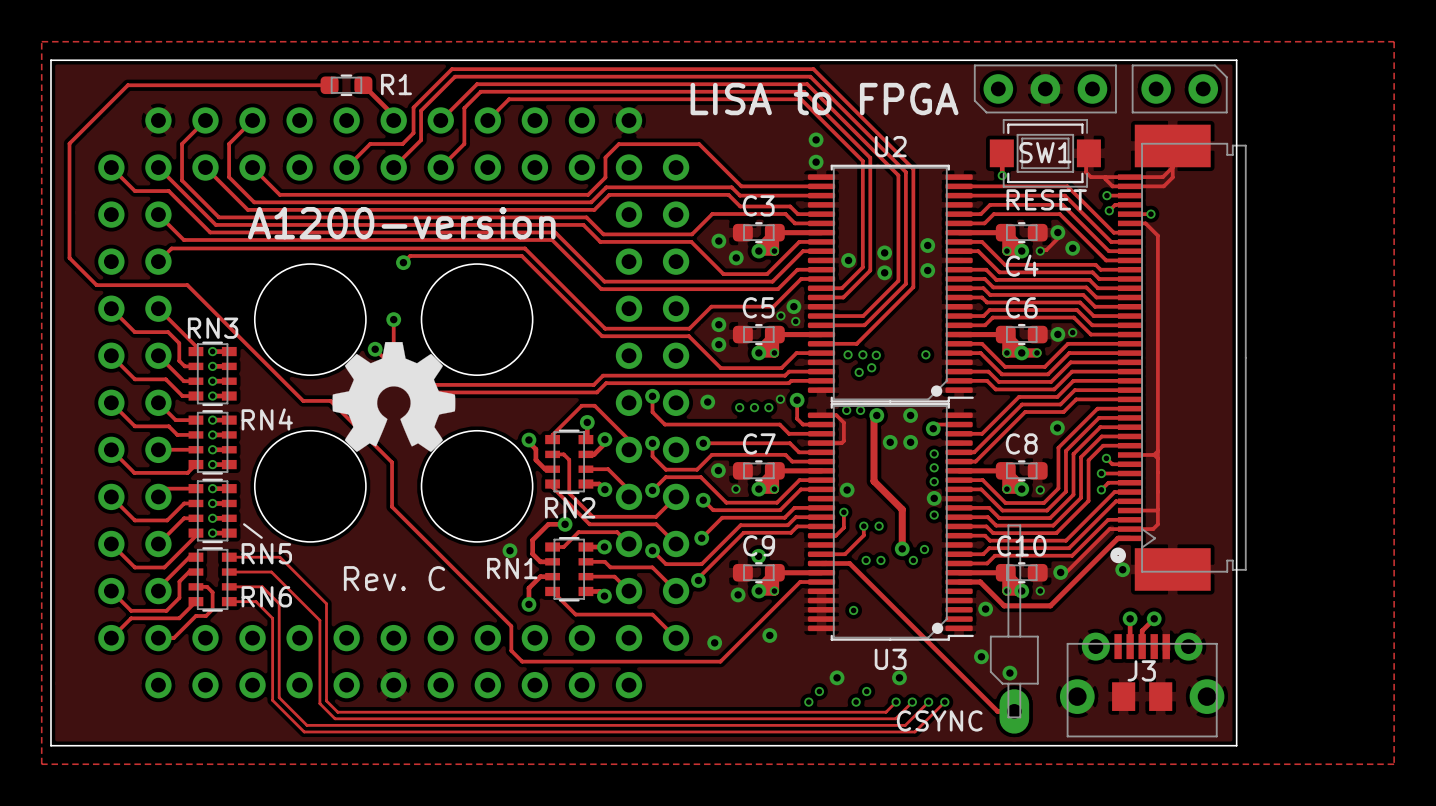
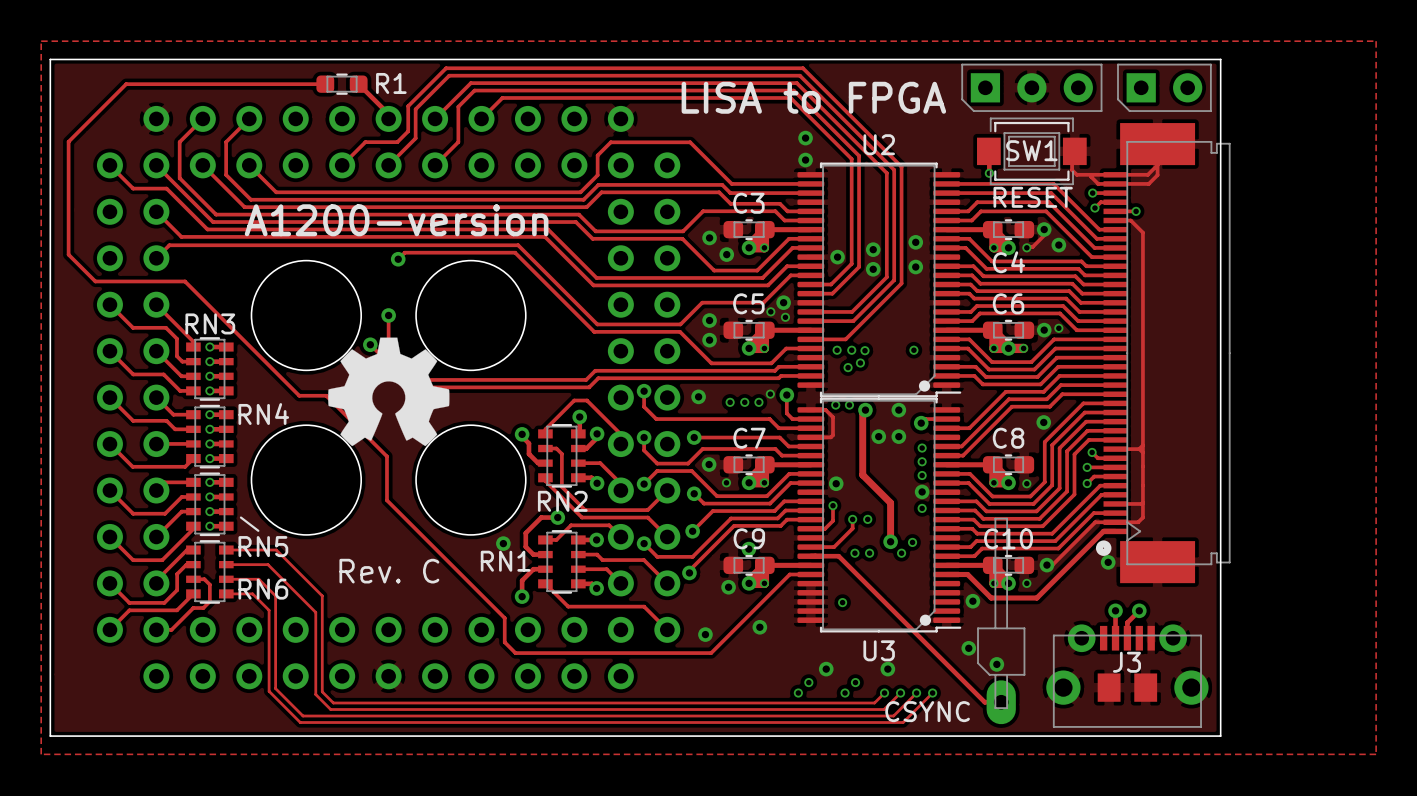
part footprint: [973, 64, 1117, 114] -> [961, 63, 1103, 112]
part footprint: [1131, 64, 1228, 114] -> [1117, 63, 1212, 112]

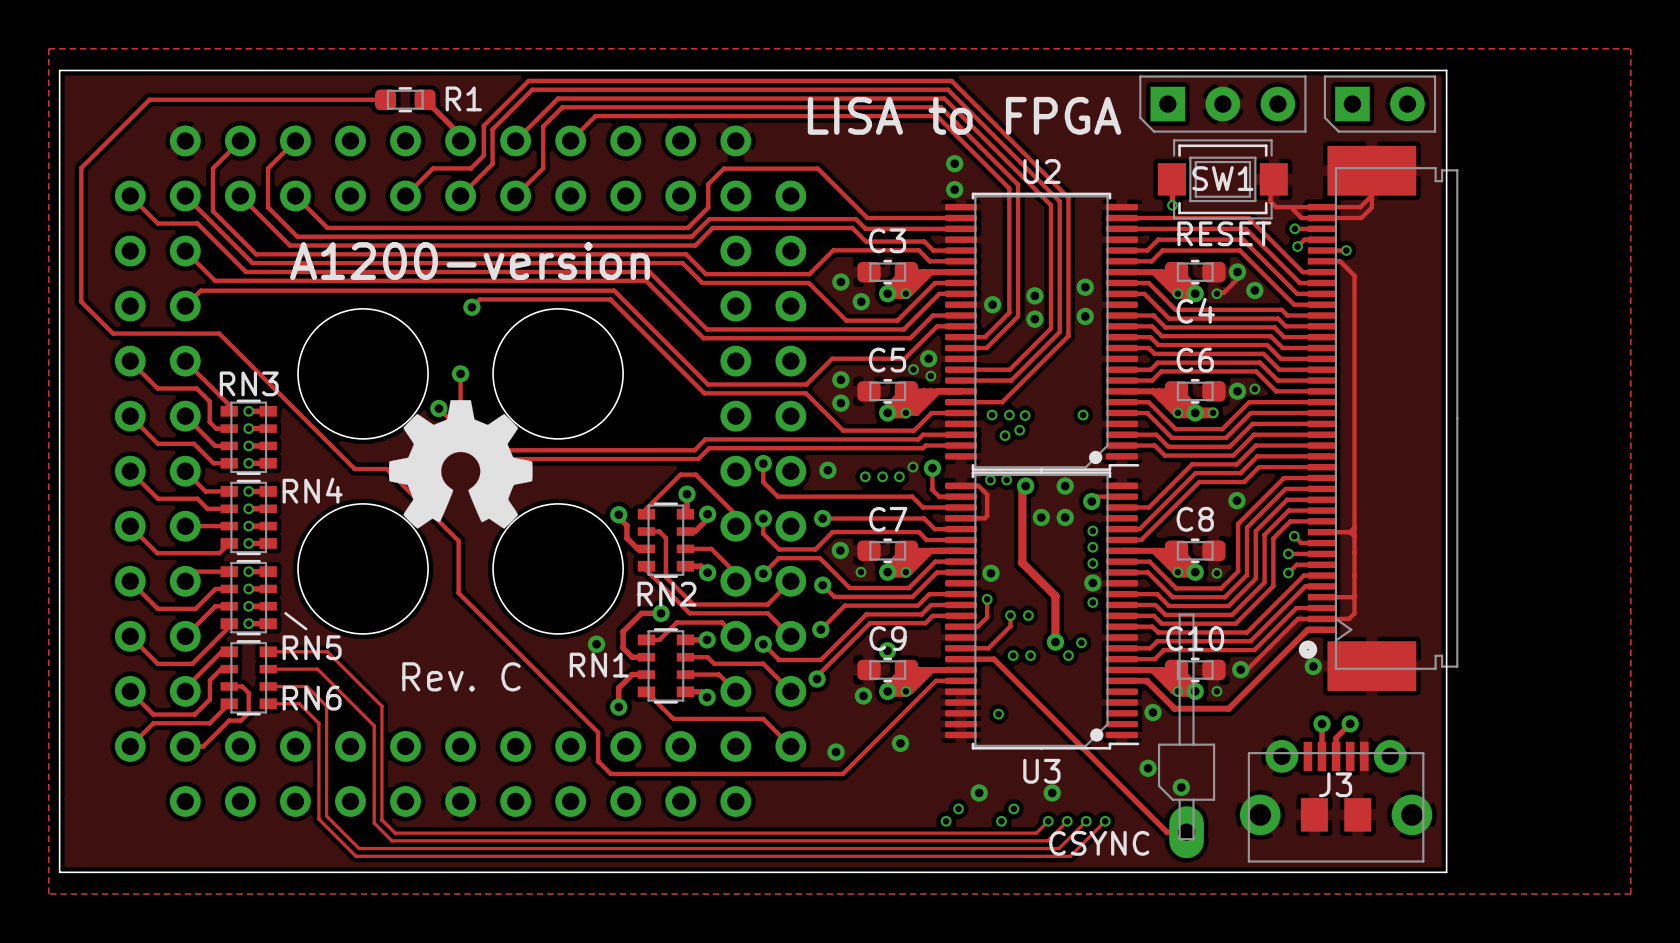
track: none -> (924, 272) (905, 290) (905, 293) (909, 293) (931, 272)
track: none -> (1153, 272) (1175, 293) (1177, 293) (1177, 289) (1160, 272)
track: none -> (924, 391) (905, 409) (905, 412) (916, 412) (938, 391)
track: none -> (930, 391) (909, 412)
track: none -> (1153, 391) (1174, 412) (1177, 412) (1158, 391)
track: none -> (924, 550) (905, 568) (905, 572) (909, 572) (931, 550)
track: none -> (1153, 550) (1175, 572) (1177, 572) (1177, 569) (1159, 550)
track: none -> (924, 670) (905, 688) (905, 691) (910, 691) (932, 670)
track: none -> (1152, 670) (1173, 691) (1177, 691) (1177, 688) (1159, 670)

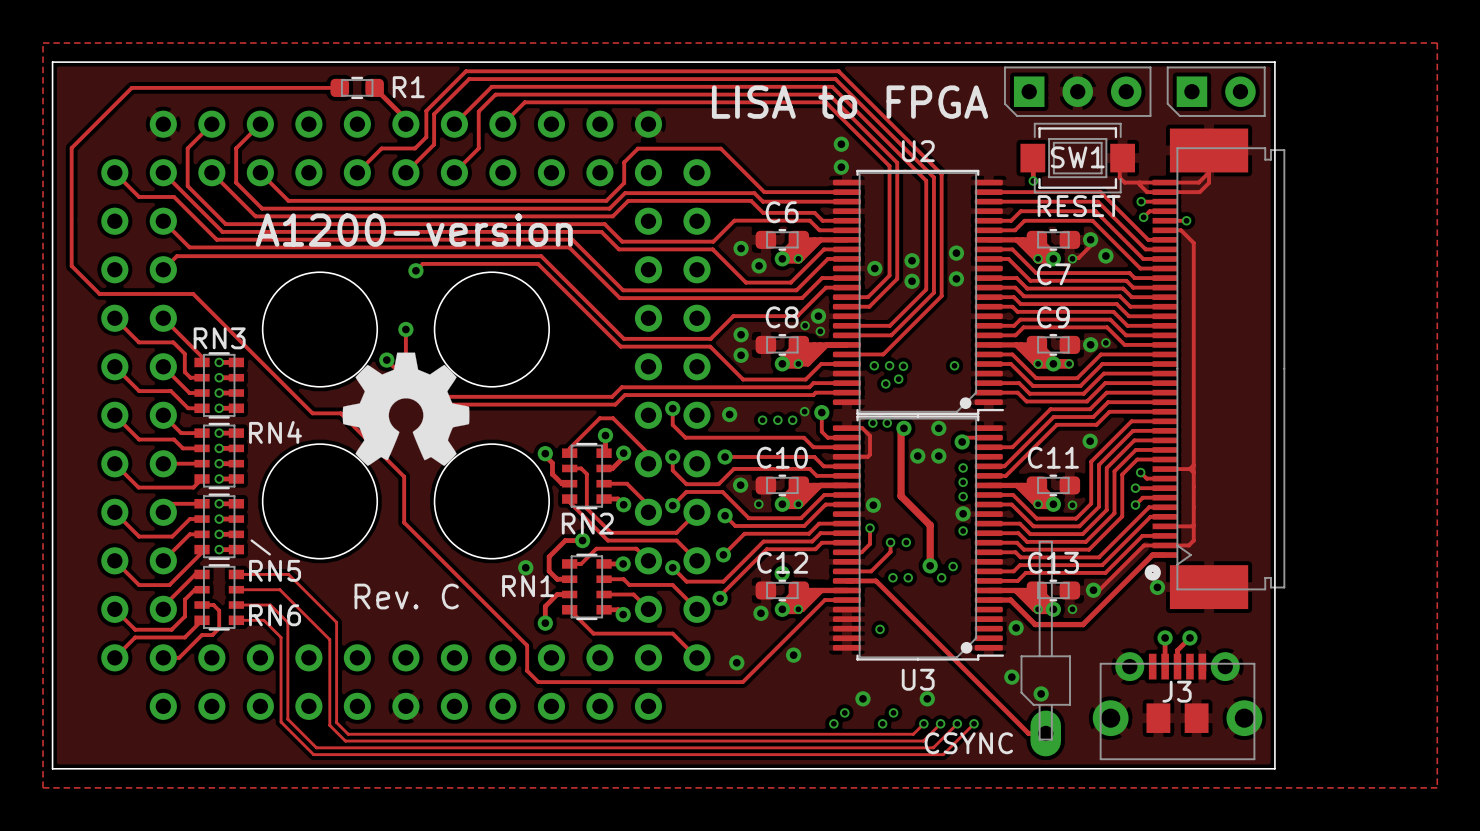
C3 name: C3 (887, 240) -> C6 (782, 212)
C4 name: C4 (1195, 310) -> C7 (1053, 274)
C5 name: C5 (887, 360) -> C8 (782, 317)
C6 name: C6 (1195, 360) -> C9 (1053, 317)
C7 name: C7 (888, 519) -> C10 (782, 457)
C8 name: C8 (1195, 519) -> C11 (1053, 457)
C9 name: C9 (888, 638) -> C12 (782, 562)
C10 name: C10 (1195, 638) -> C13 (1053, 562)

